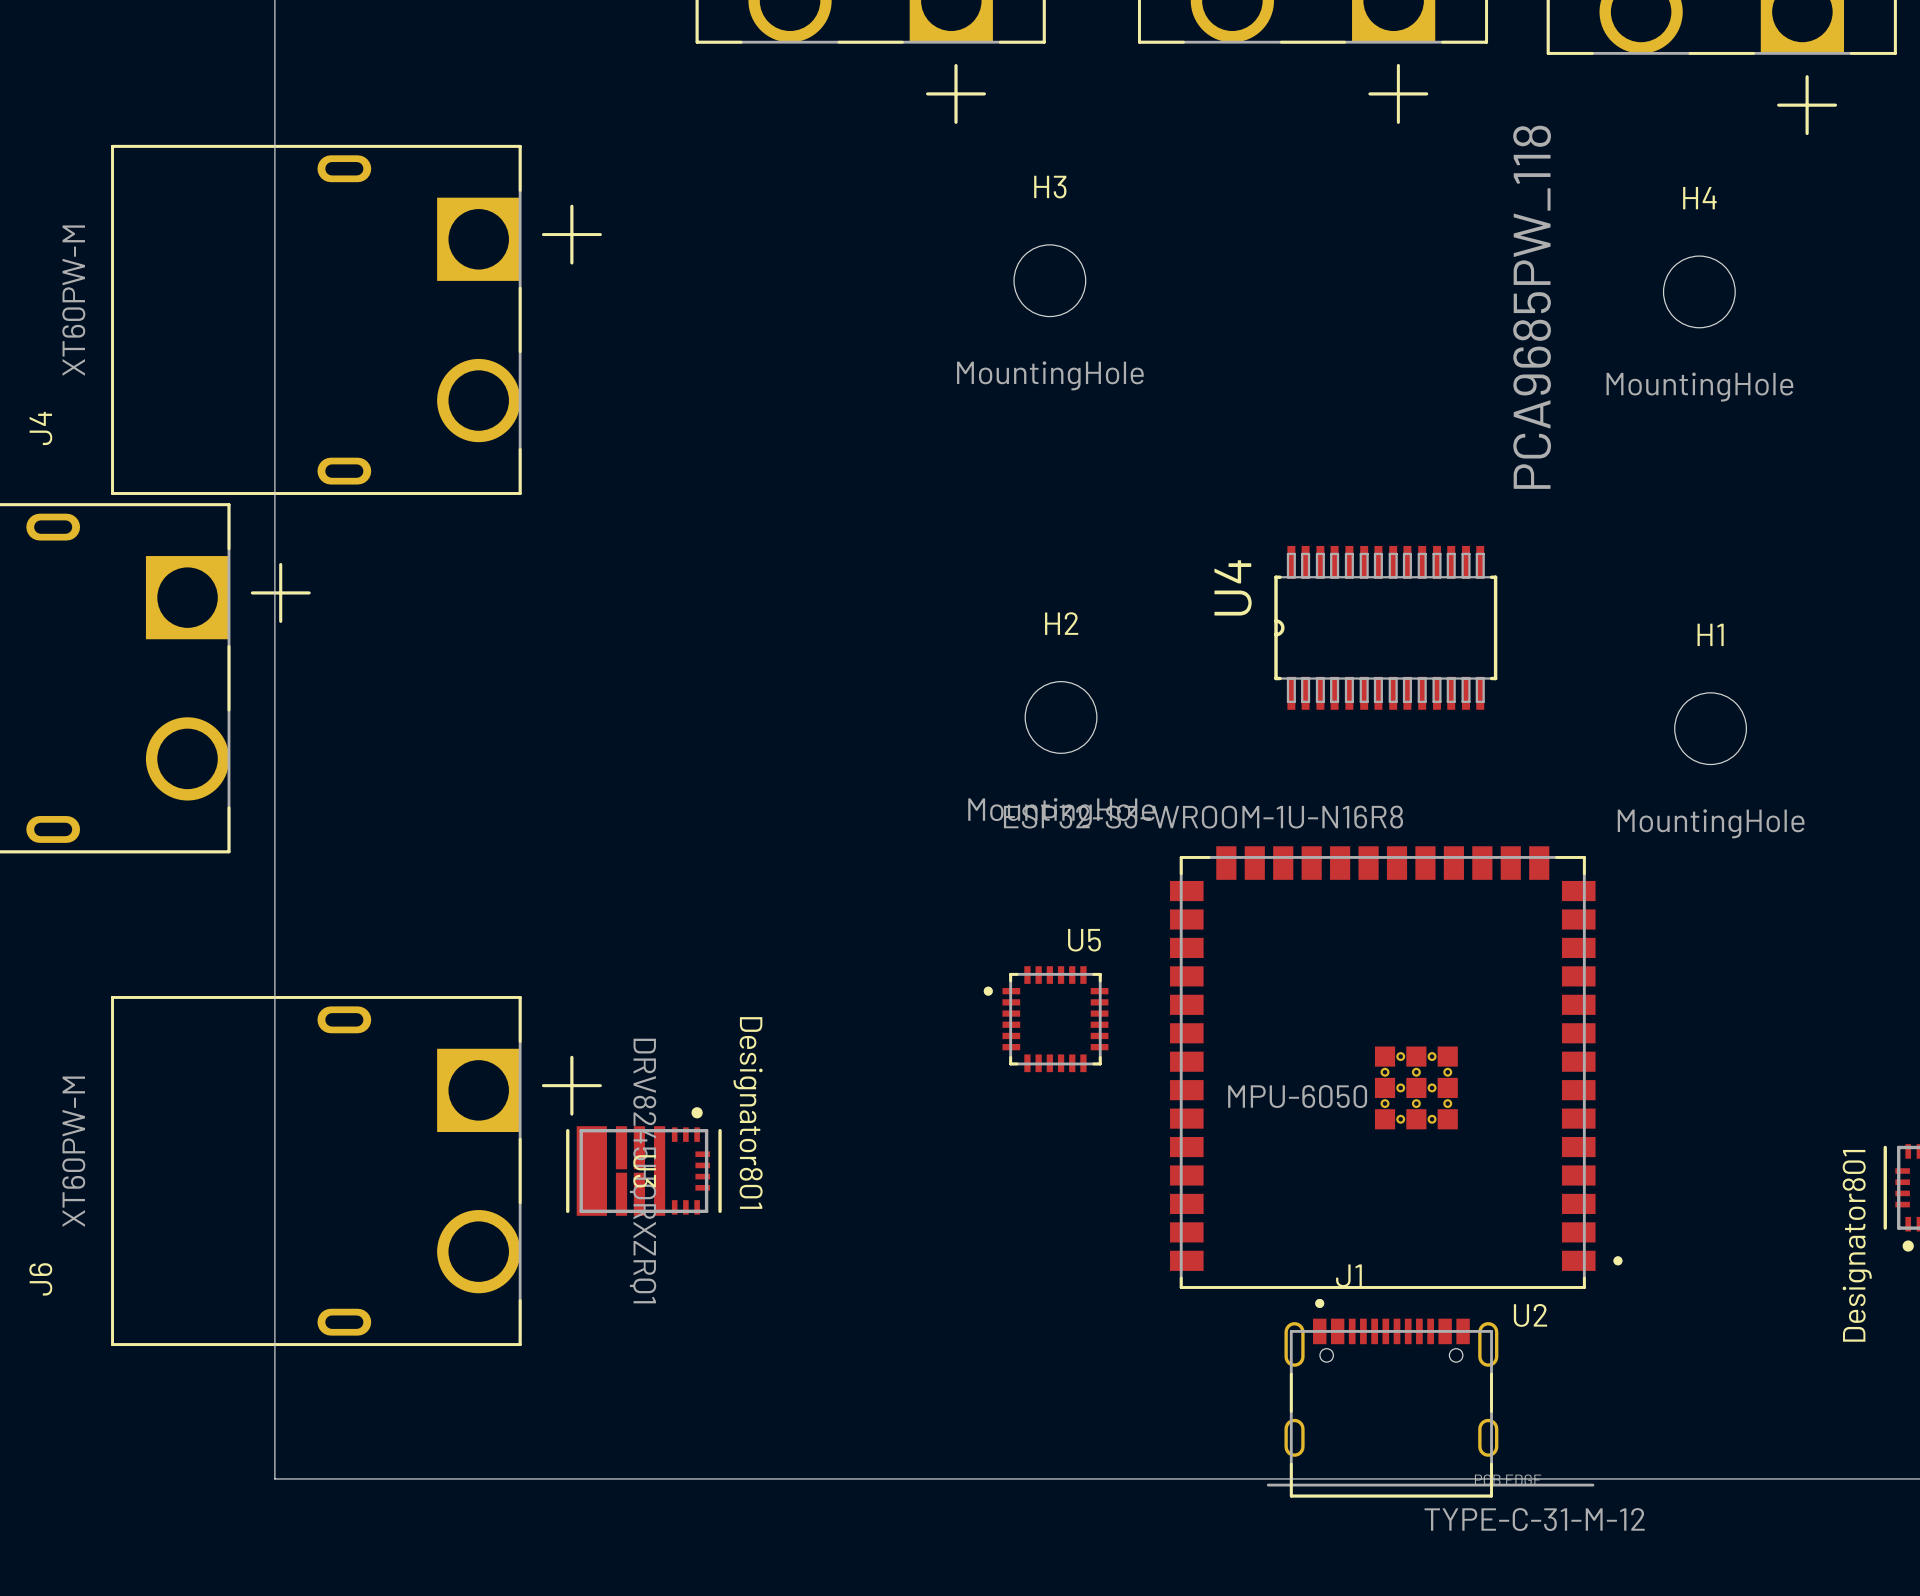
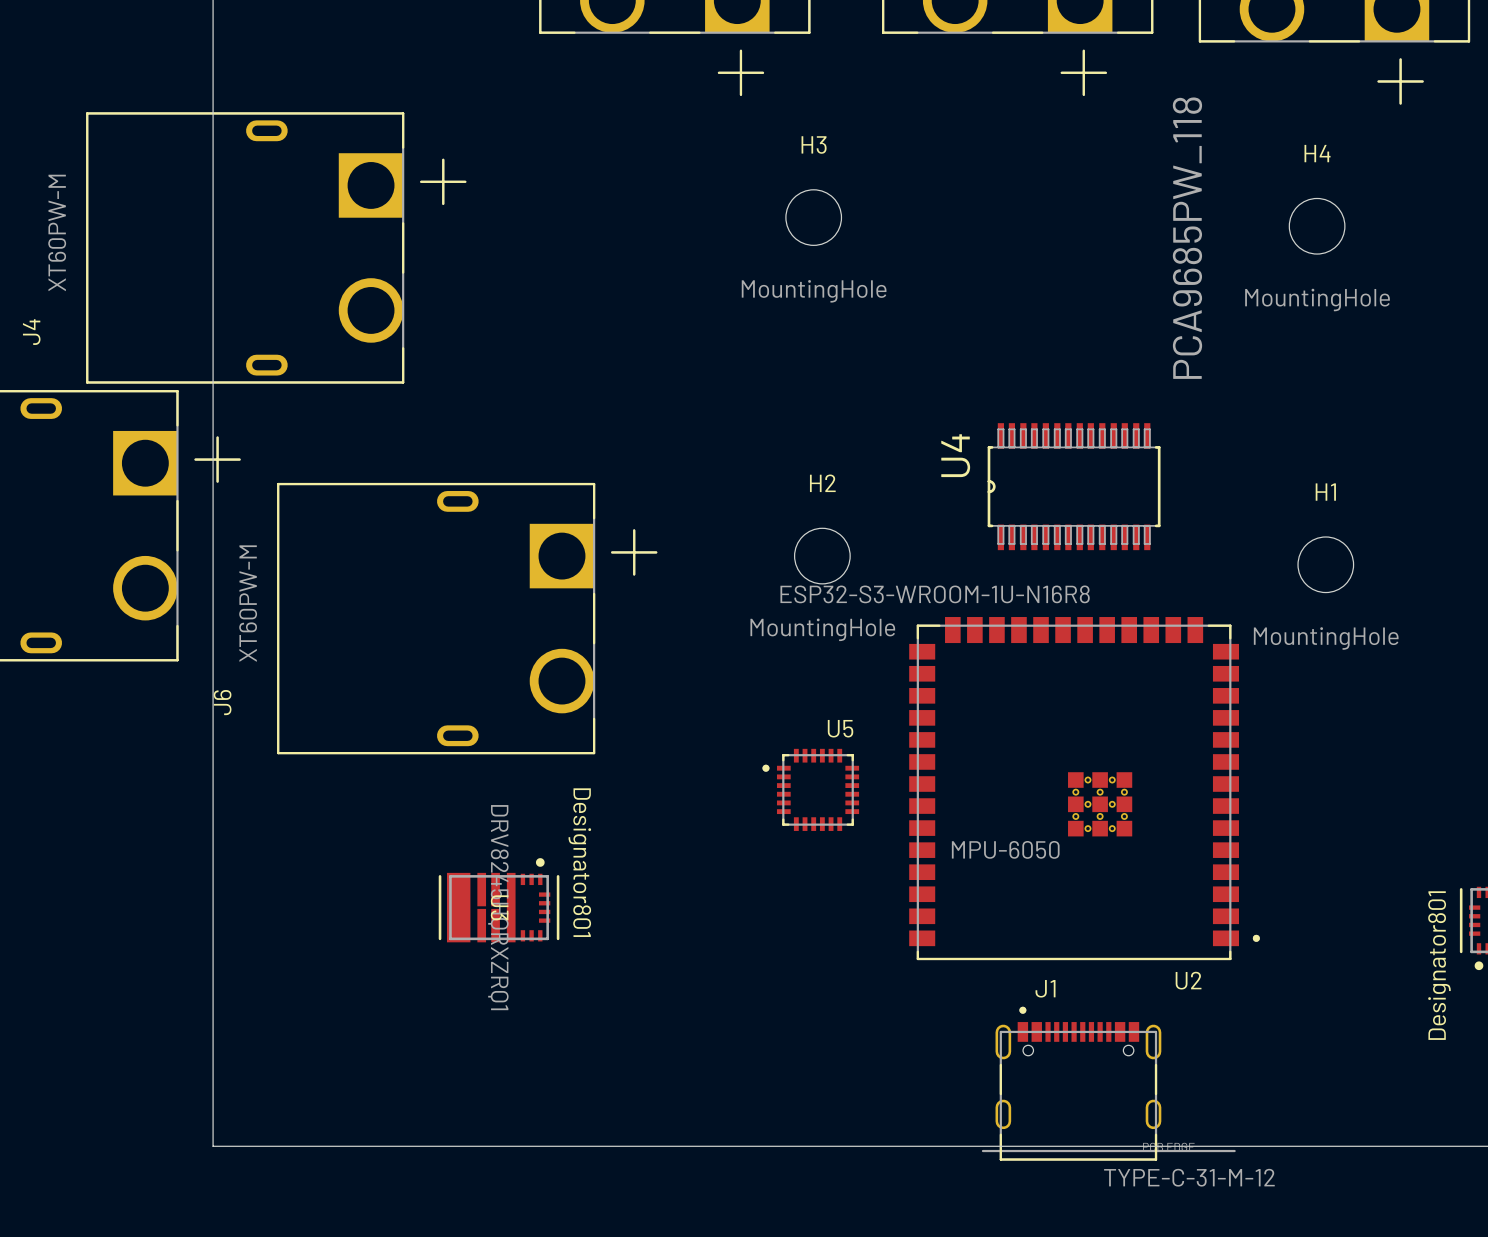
U2 position: (1396, 1067) -> (1084, 788)
J6 position: (356, 1171) -> (467, 618)

